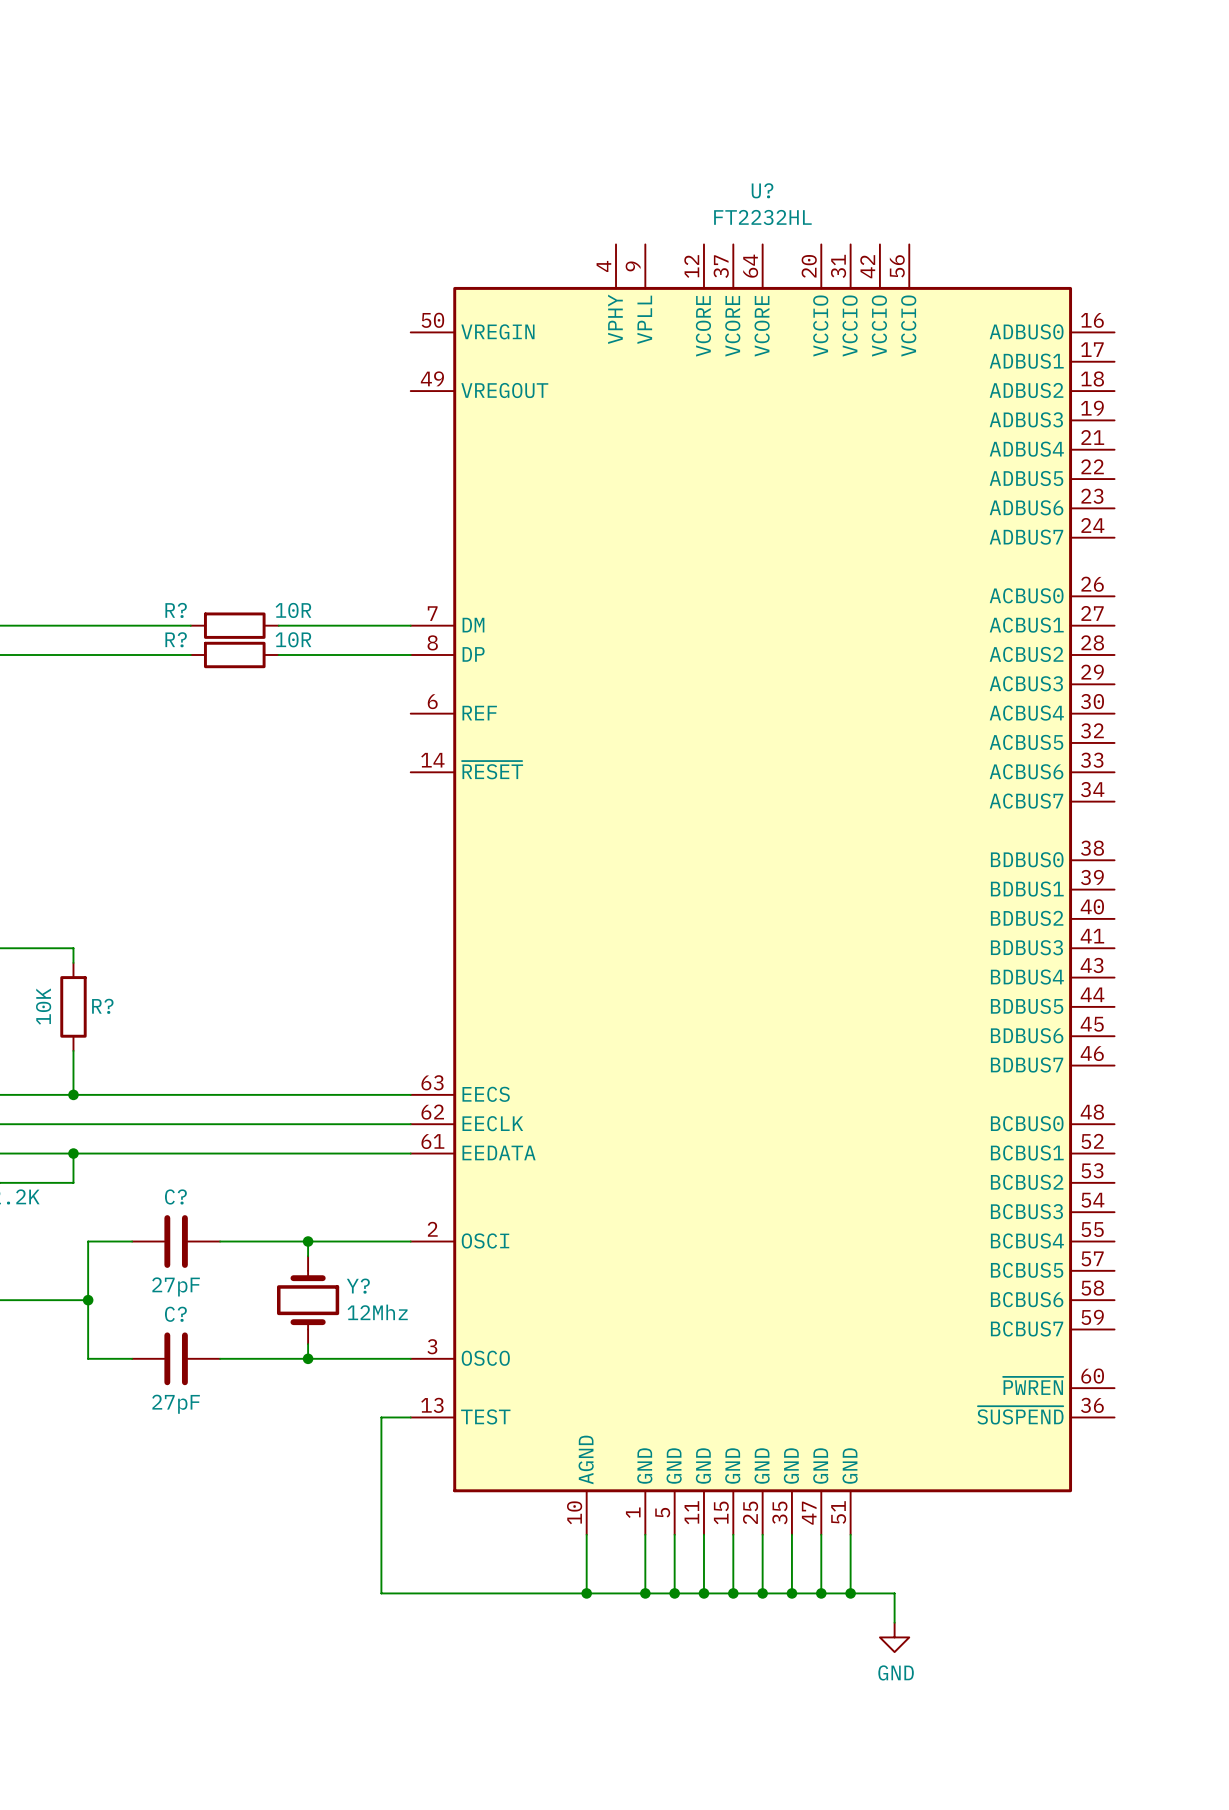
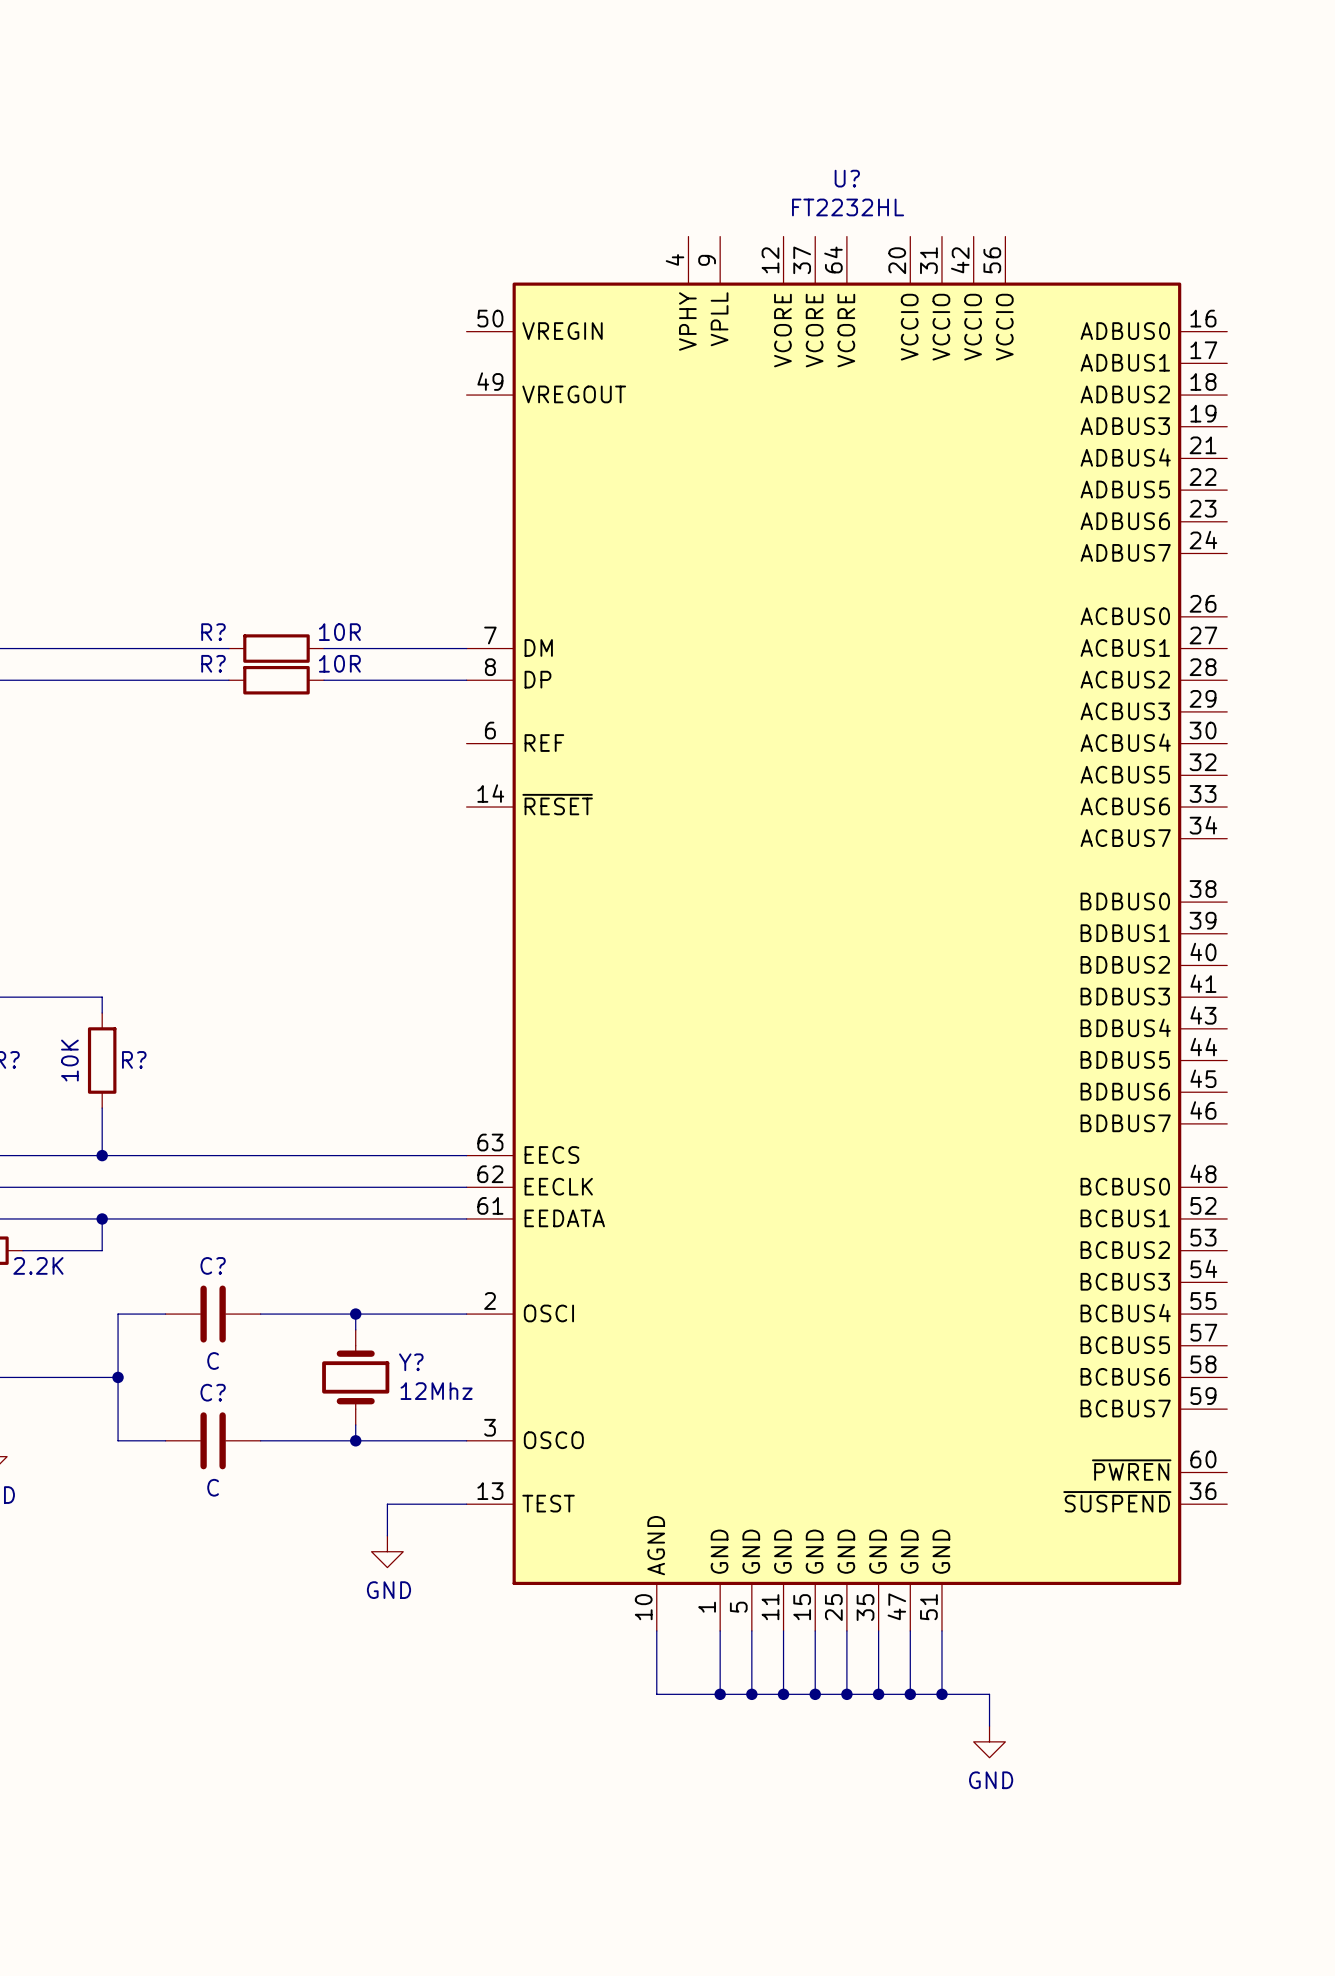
C? value: 27pF (176, 1286) -> C (213, 1360)
C? value: 27pF (176, 1404) -> C (213, 1487)
wire: (381, 1417) (381, 1593) (586, 1593) -> (434, 1504) (387, 1504) (387, 1535)
power symbol: none -> GND (387, 1551)
junction: (586, 1593) -> none

